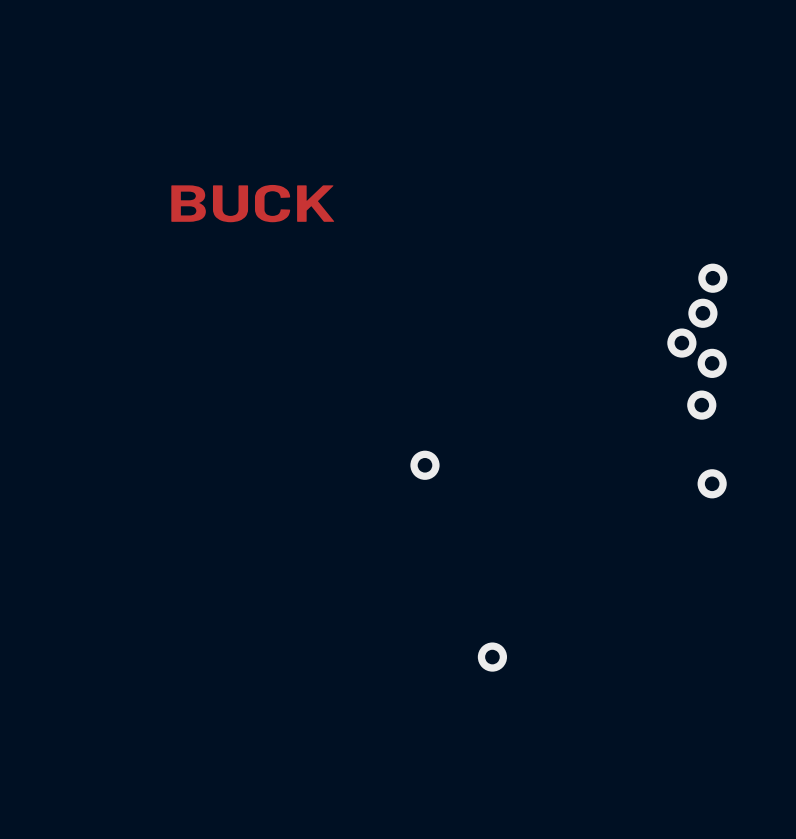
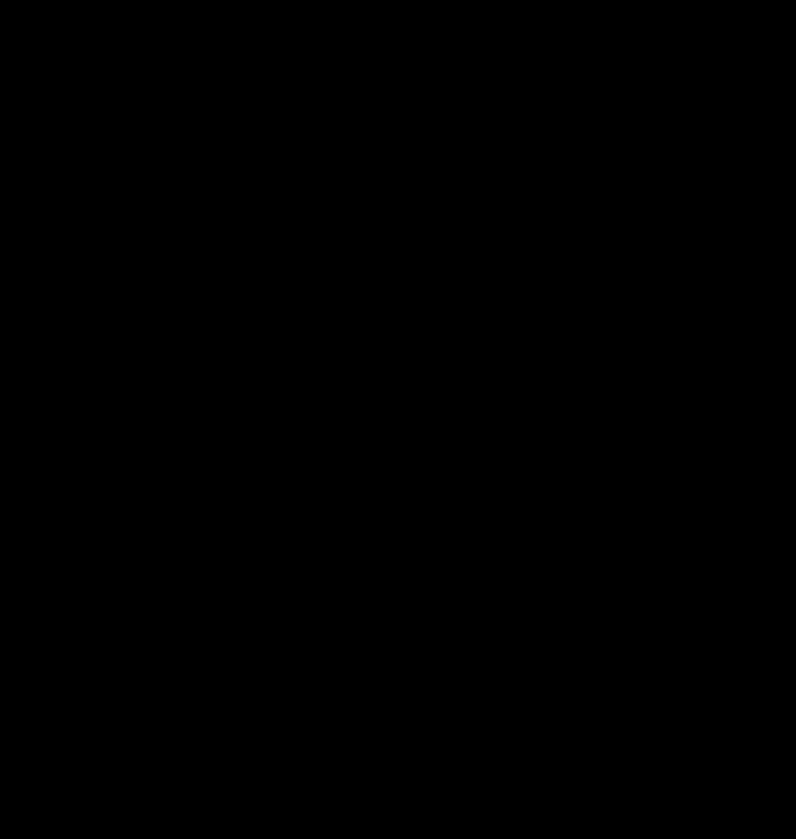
text: BUCK (252, 203) -> none
via: (712, 278) -> none
via: (702, 313) -> none
via: (681, 343) -> none
via: (712, 363) -> none
via: (701, 405) -> none
via: (424, 465) -> none
via: (712, 483) -> none
via: (492, 657) -> none

